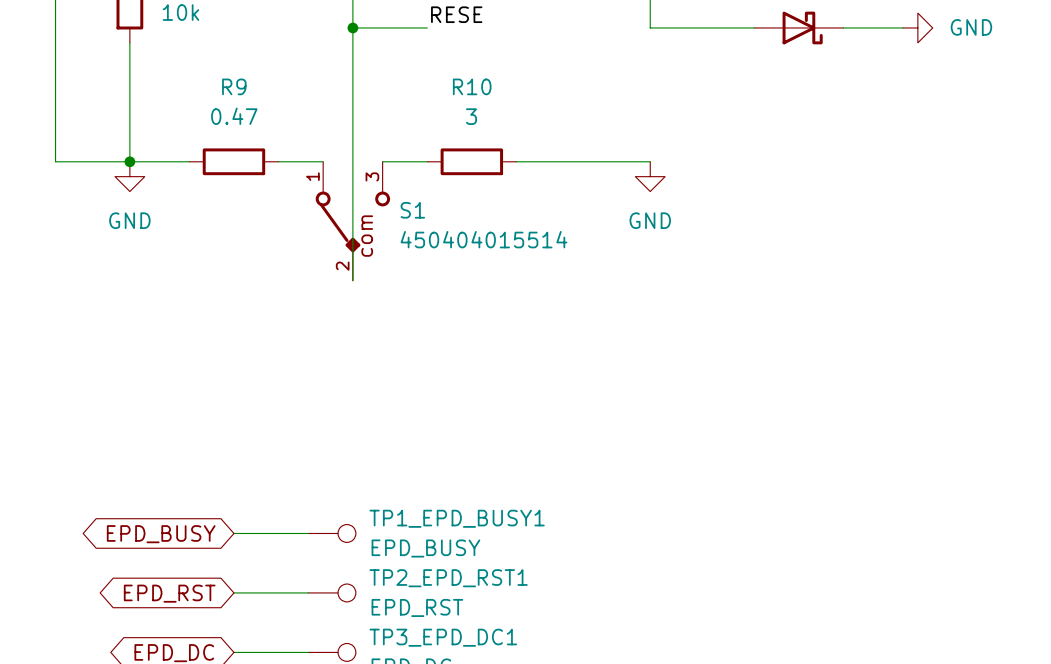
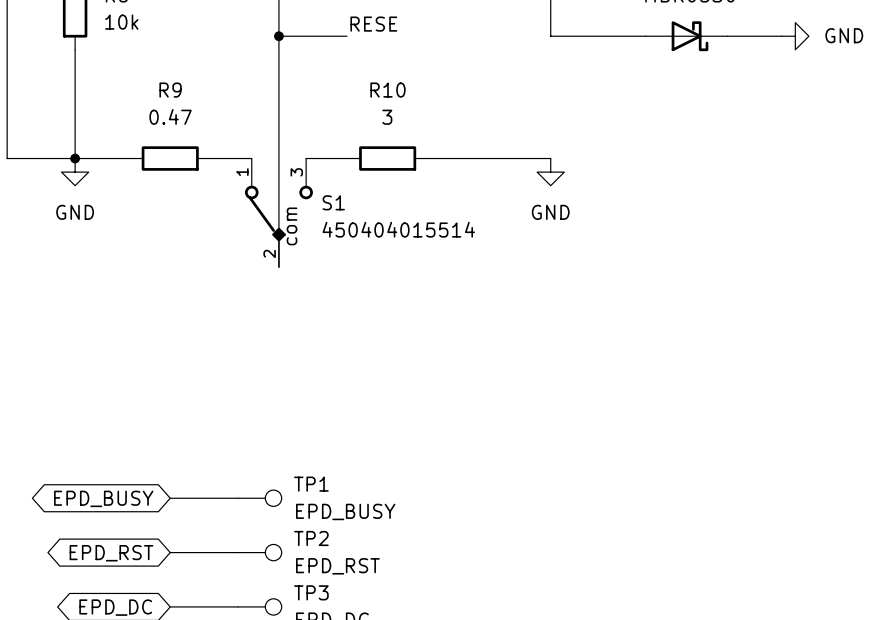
TP1_EPD_BUSY1 name: TP1_EPD_BUSY1 (457, 518) -> TP1 (311, 484)
TP2_EPD_RST1 name: TP2_EPD_RST1 (448, 578) -> TP2 (311, 538)
TP3_EPD_DC1 name: TP3_EPD_DC1 (443, 637) -> TP3 (311, 592)

